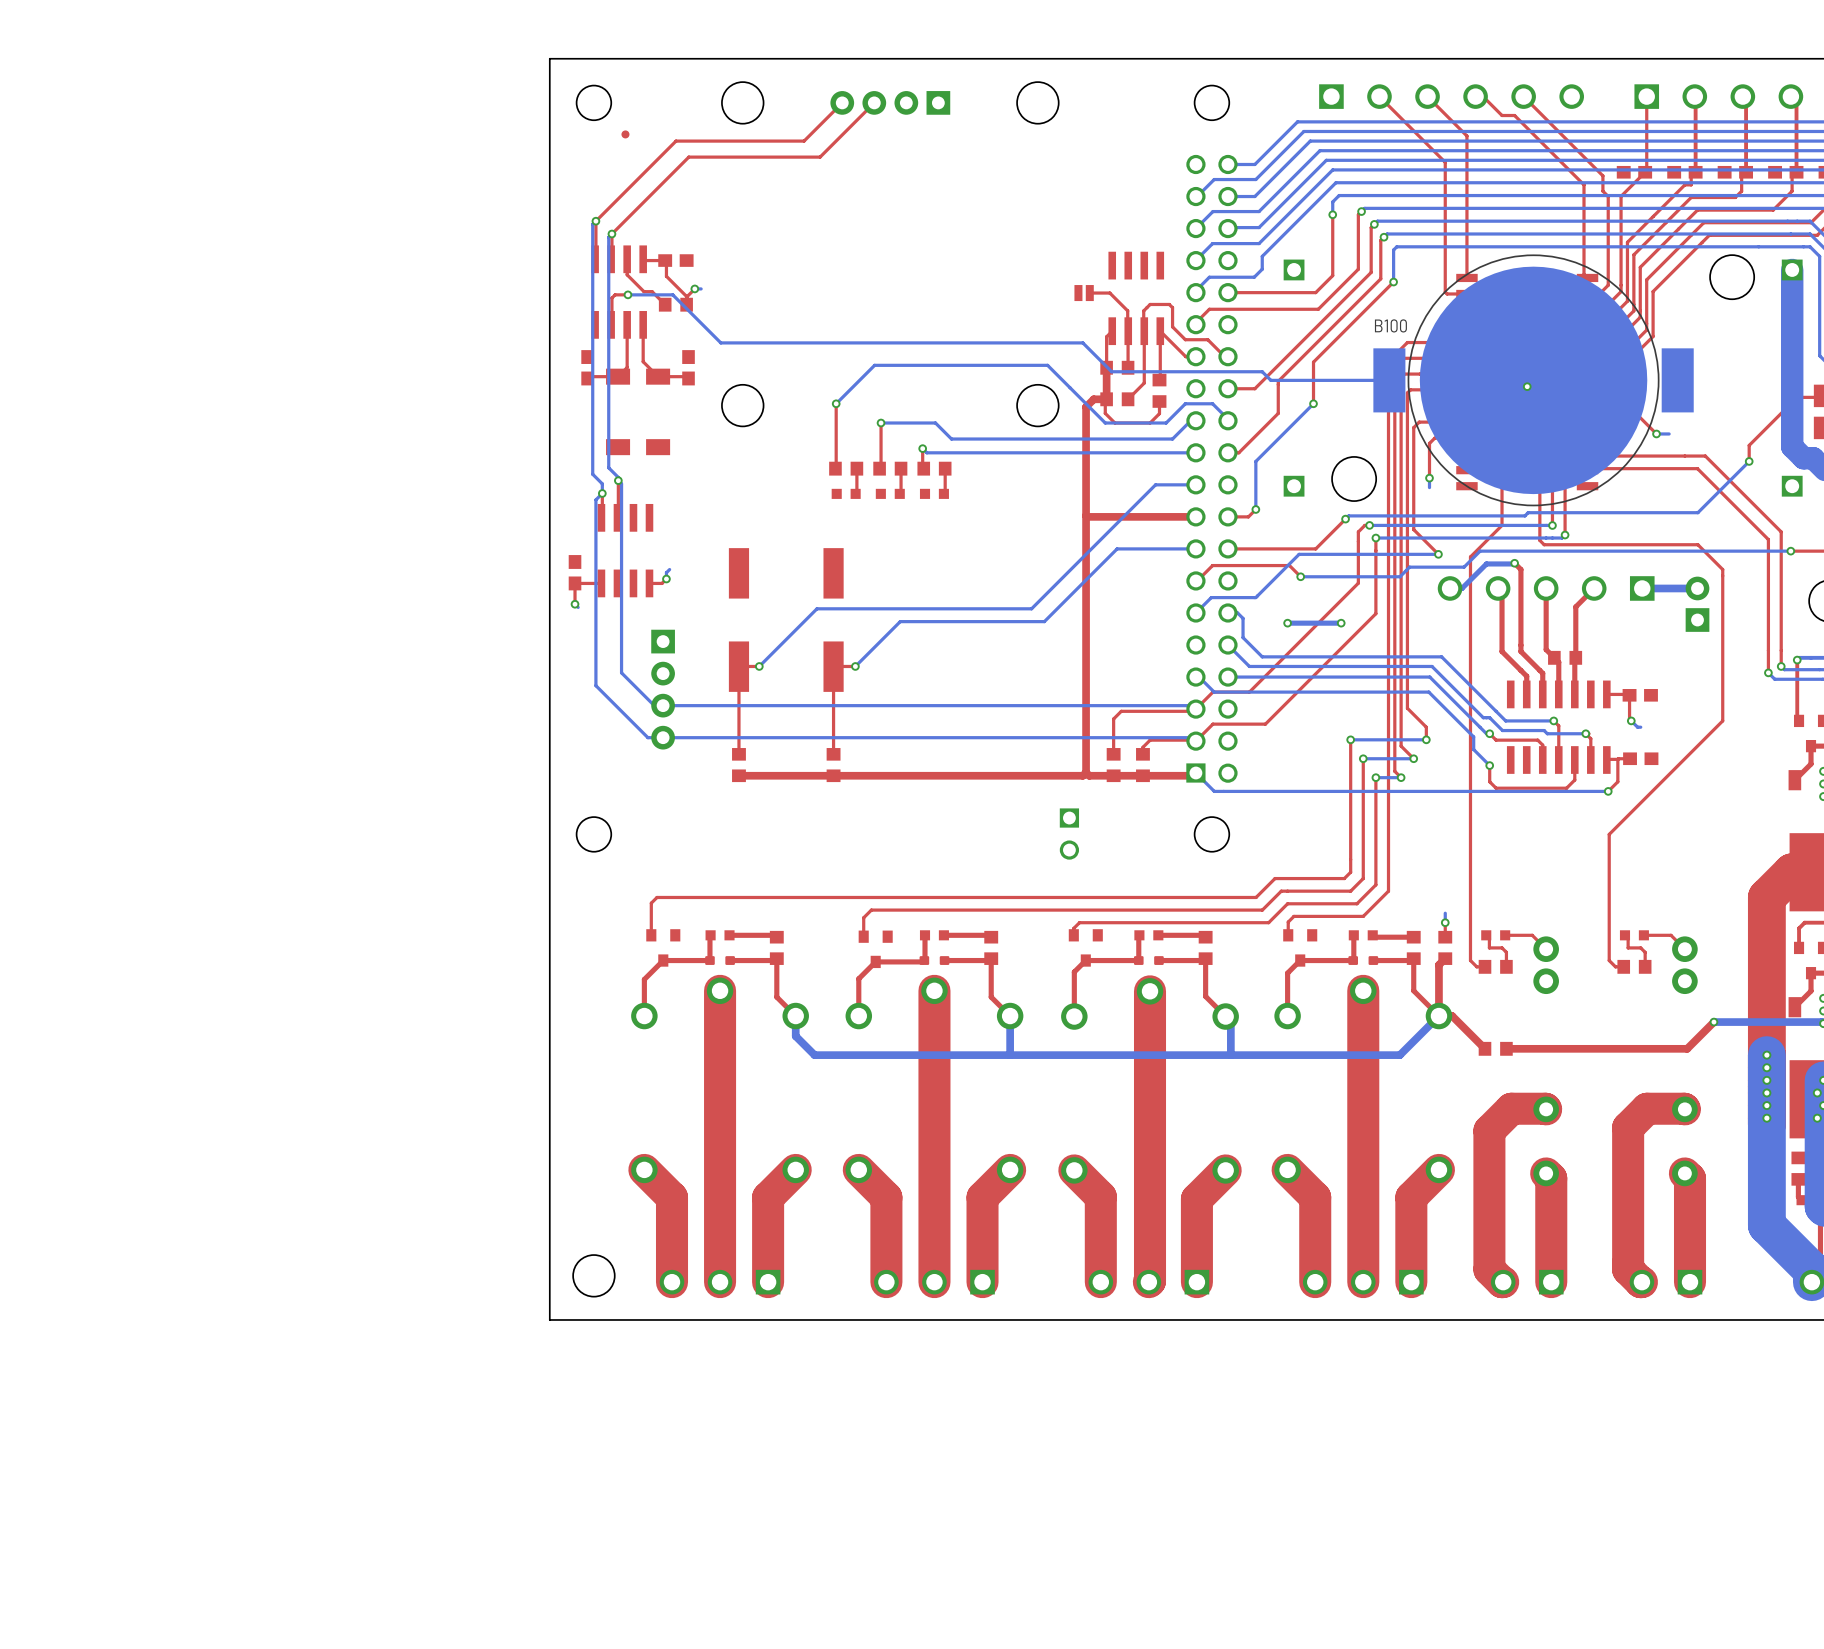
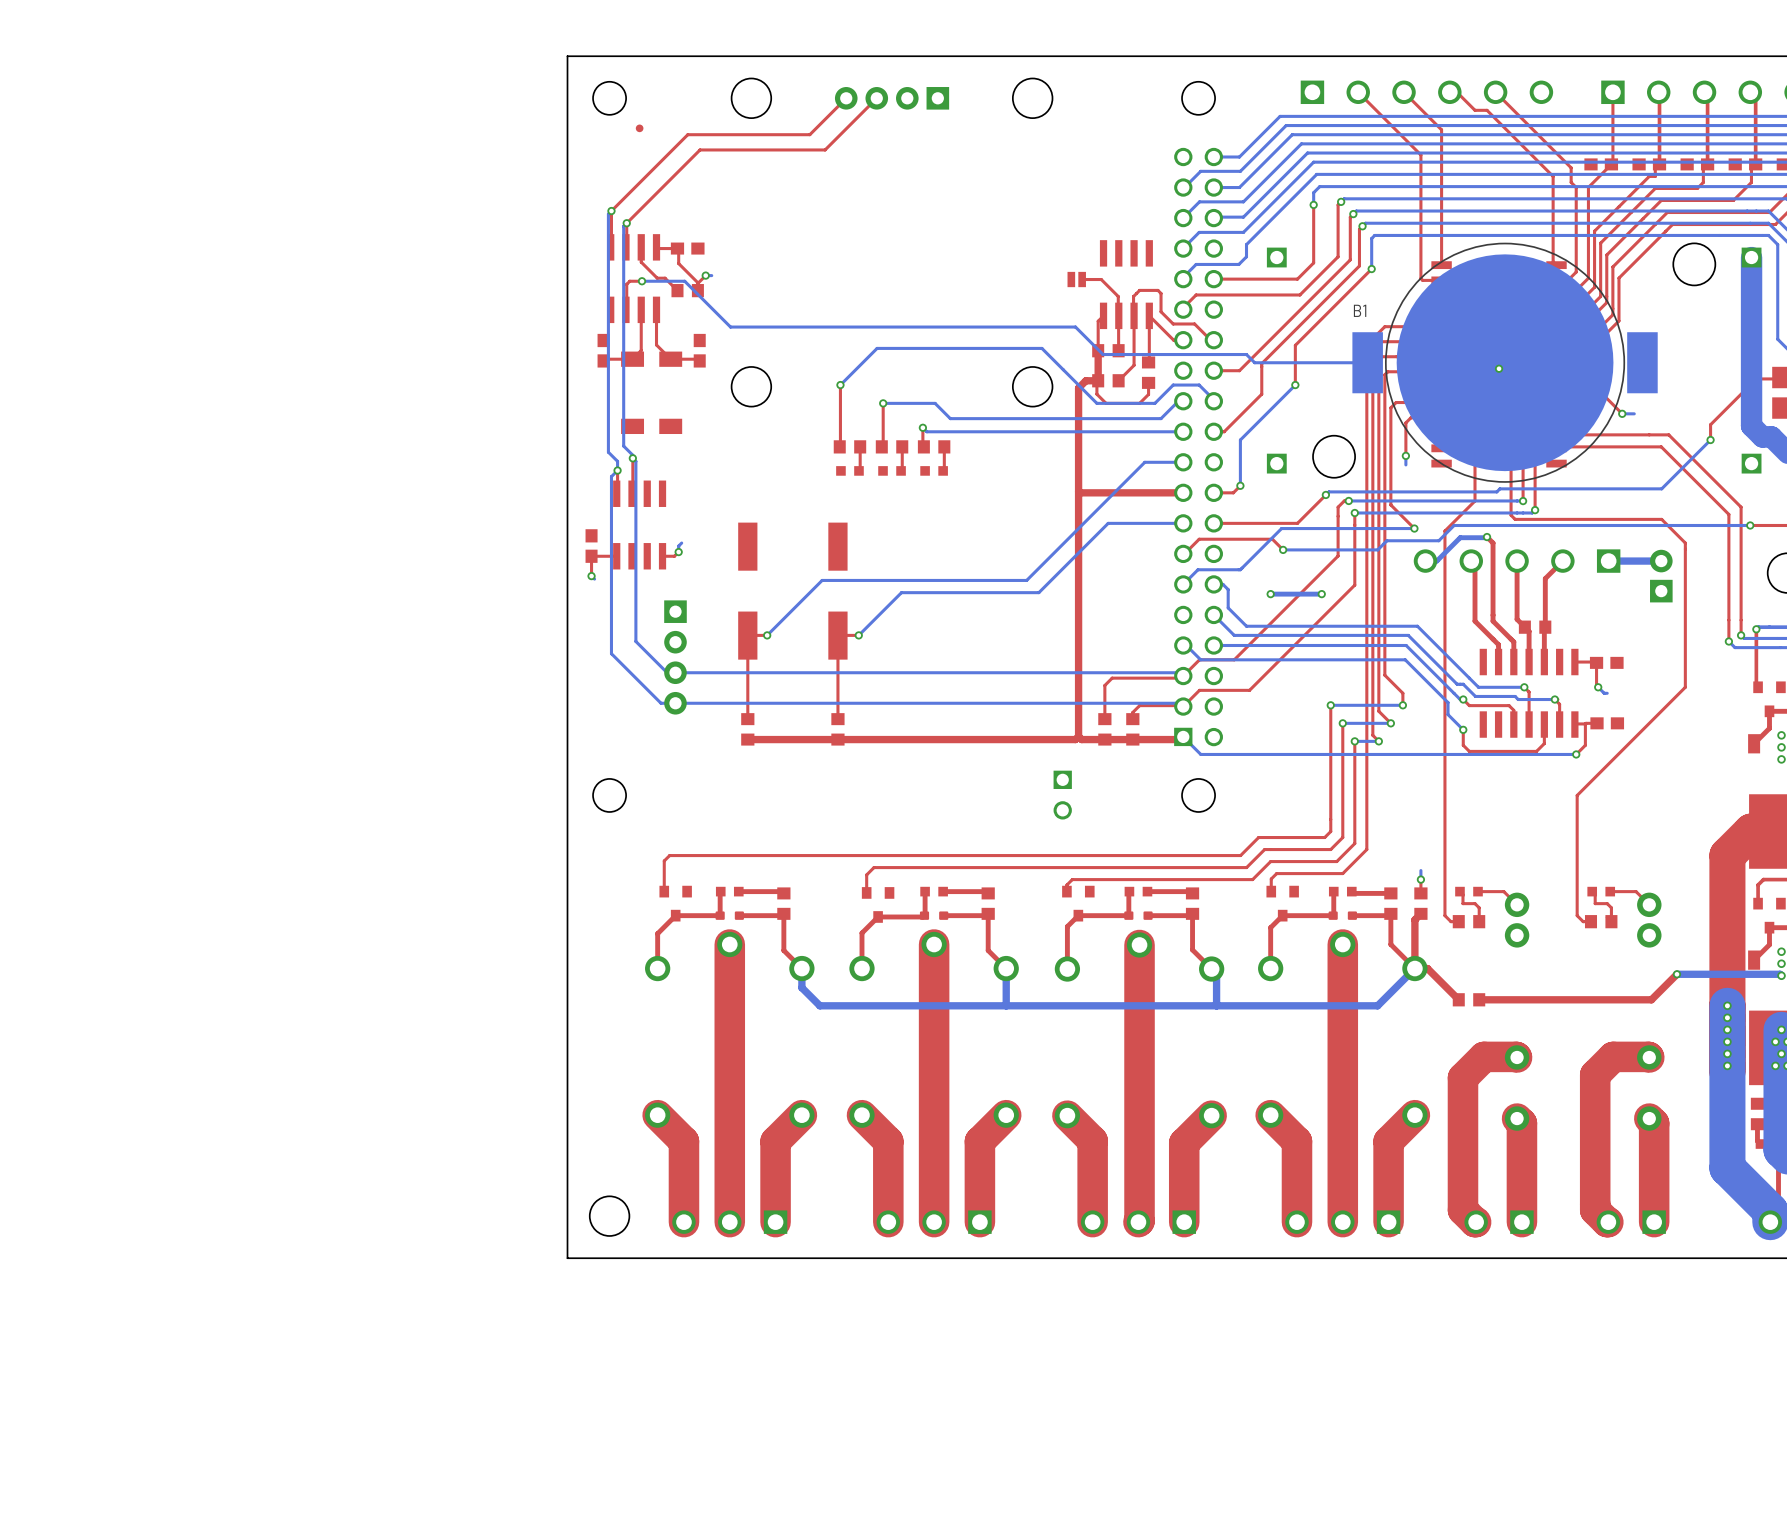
B100 name: B100 (1390, 325) -> B1 (1360, 310)

